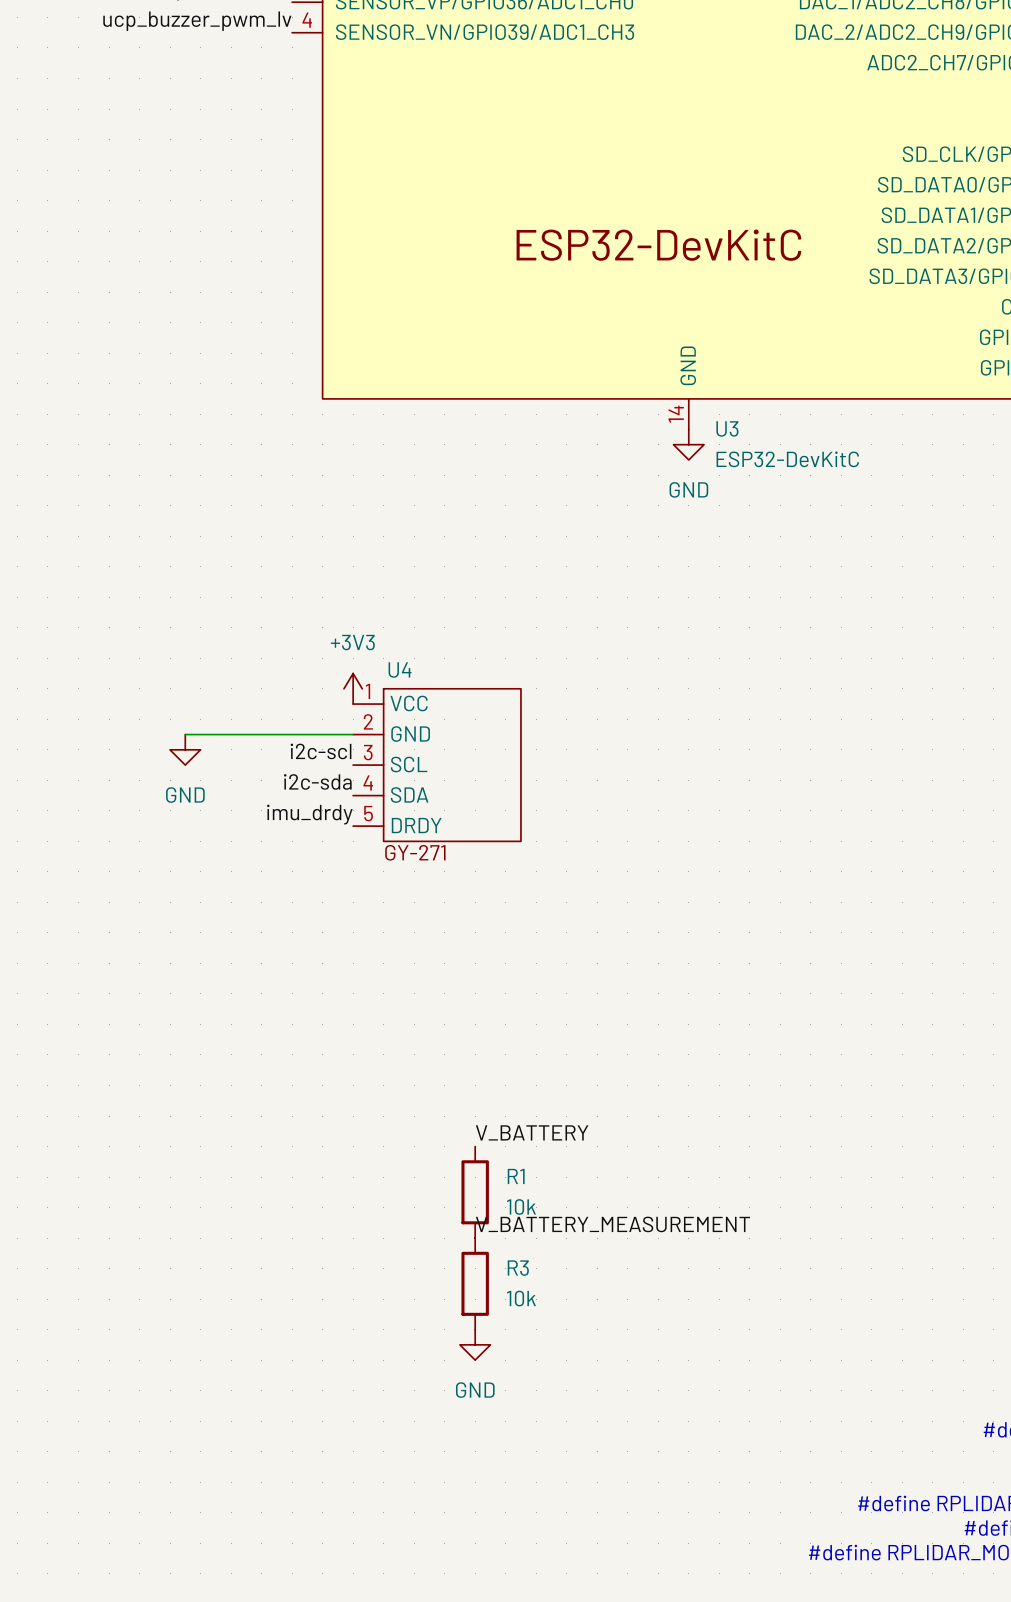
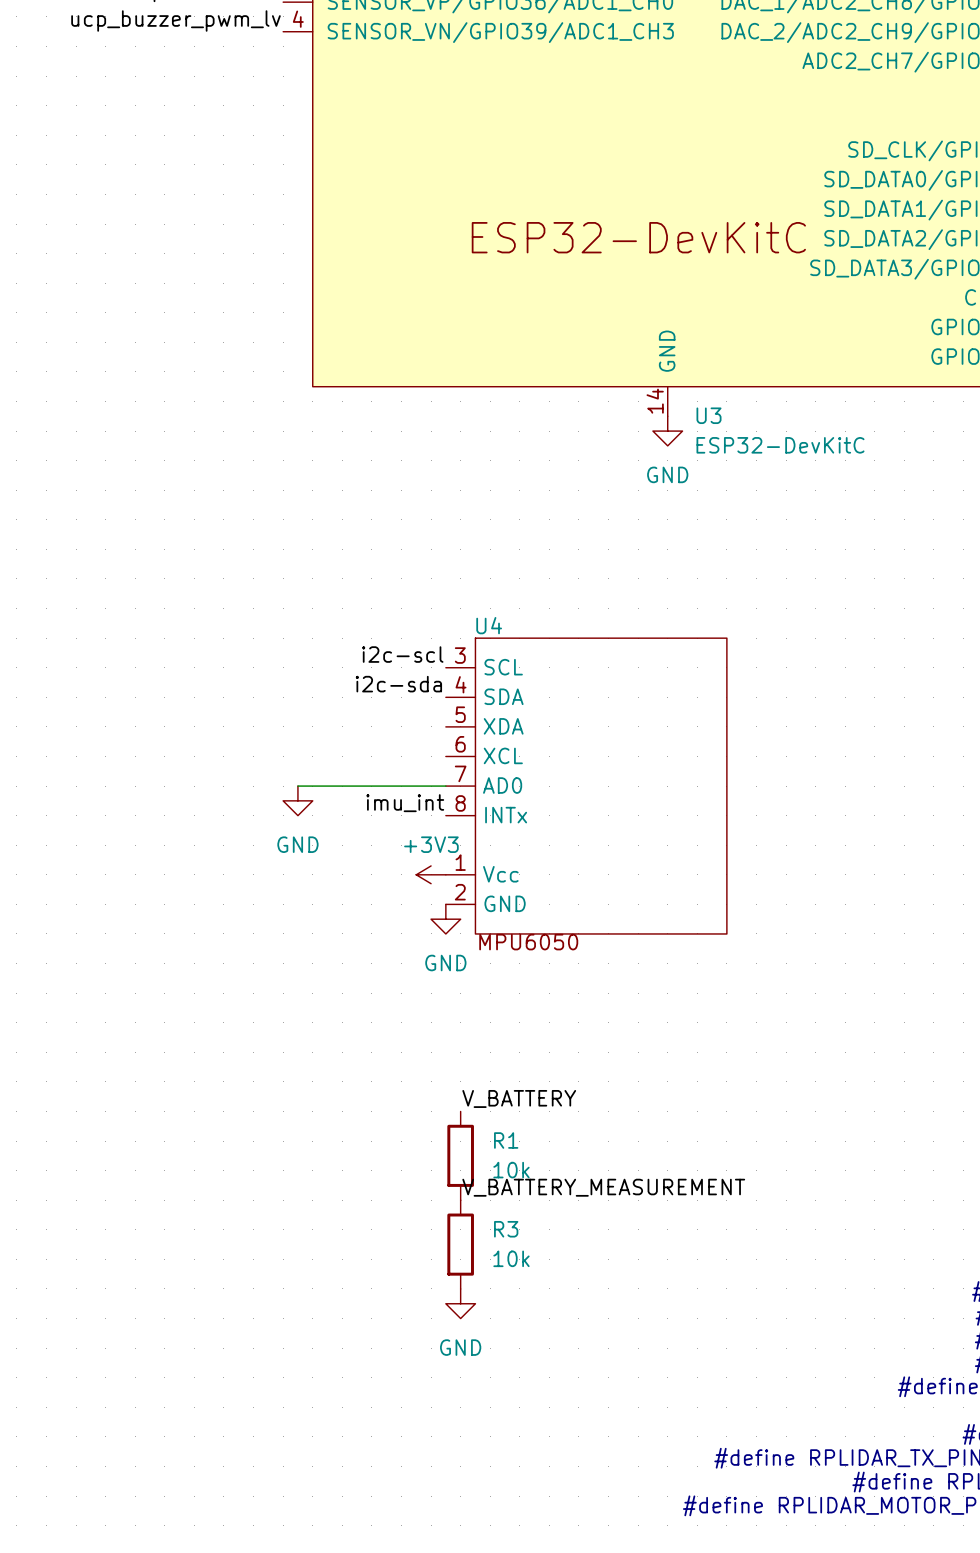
U4 name position: U4 (400, 670) -> U4 (489, 625)
U4 symbol: [353, 688, 521, 842] -> [445, 638, 727, 934]
power symbol rotation: 0° (353, 688) -> 90° counterclockwise (431, 874)
power symbol position: +3V3 (353, 688) -> +3V3 (431, 874)
wire: (185, 734) (353, 734) -> none
power symbol position: GND (185, 749) -> GND (297, 800)
label position: i2c-scl (321, 751) -> i2c-scl (402, 654)
label position: i2c-sda (317, 781) -> i2c-sda (398, 684)
wire: none -> (297, 786) (445, 786)
label: imu_drdy (309, 814) -> none
label: none -> imu_int (405, 803)
power symbol: none -> GND (445, 919)

